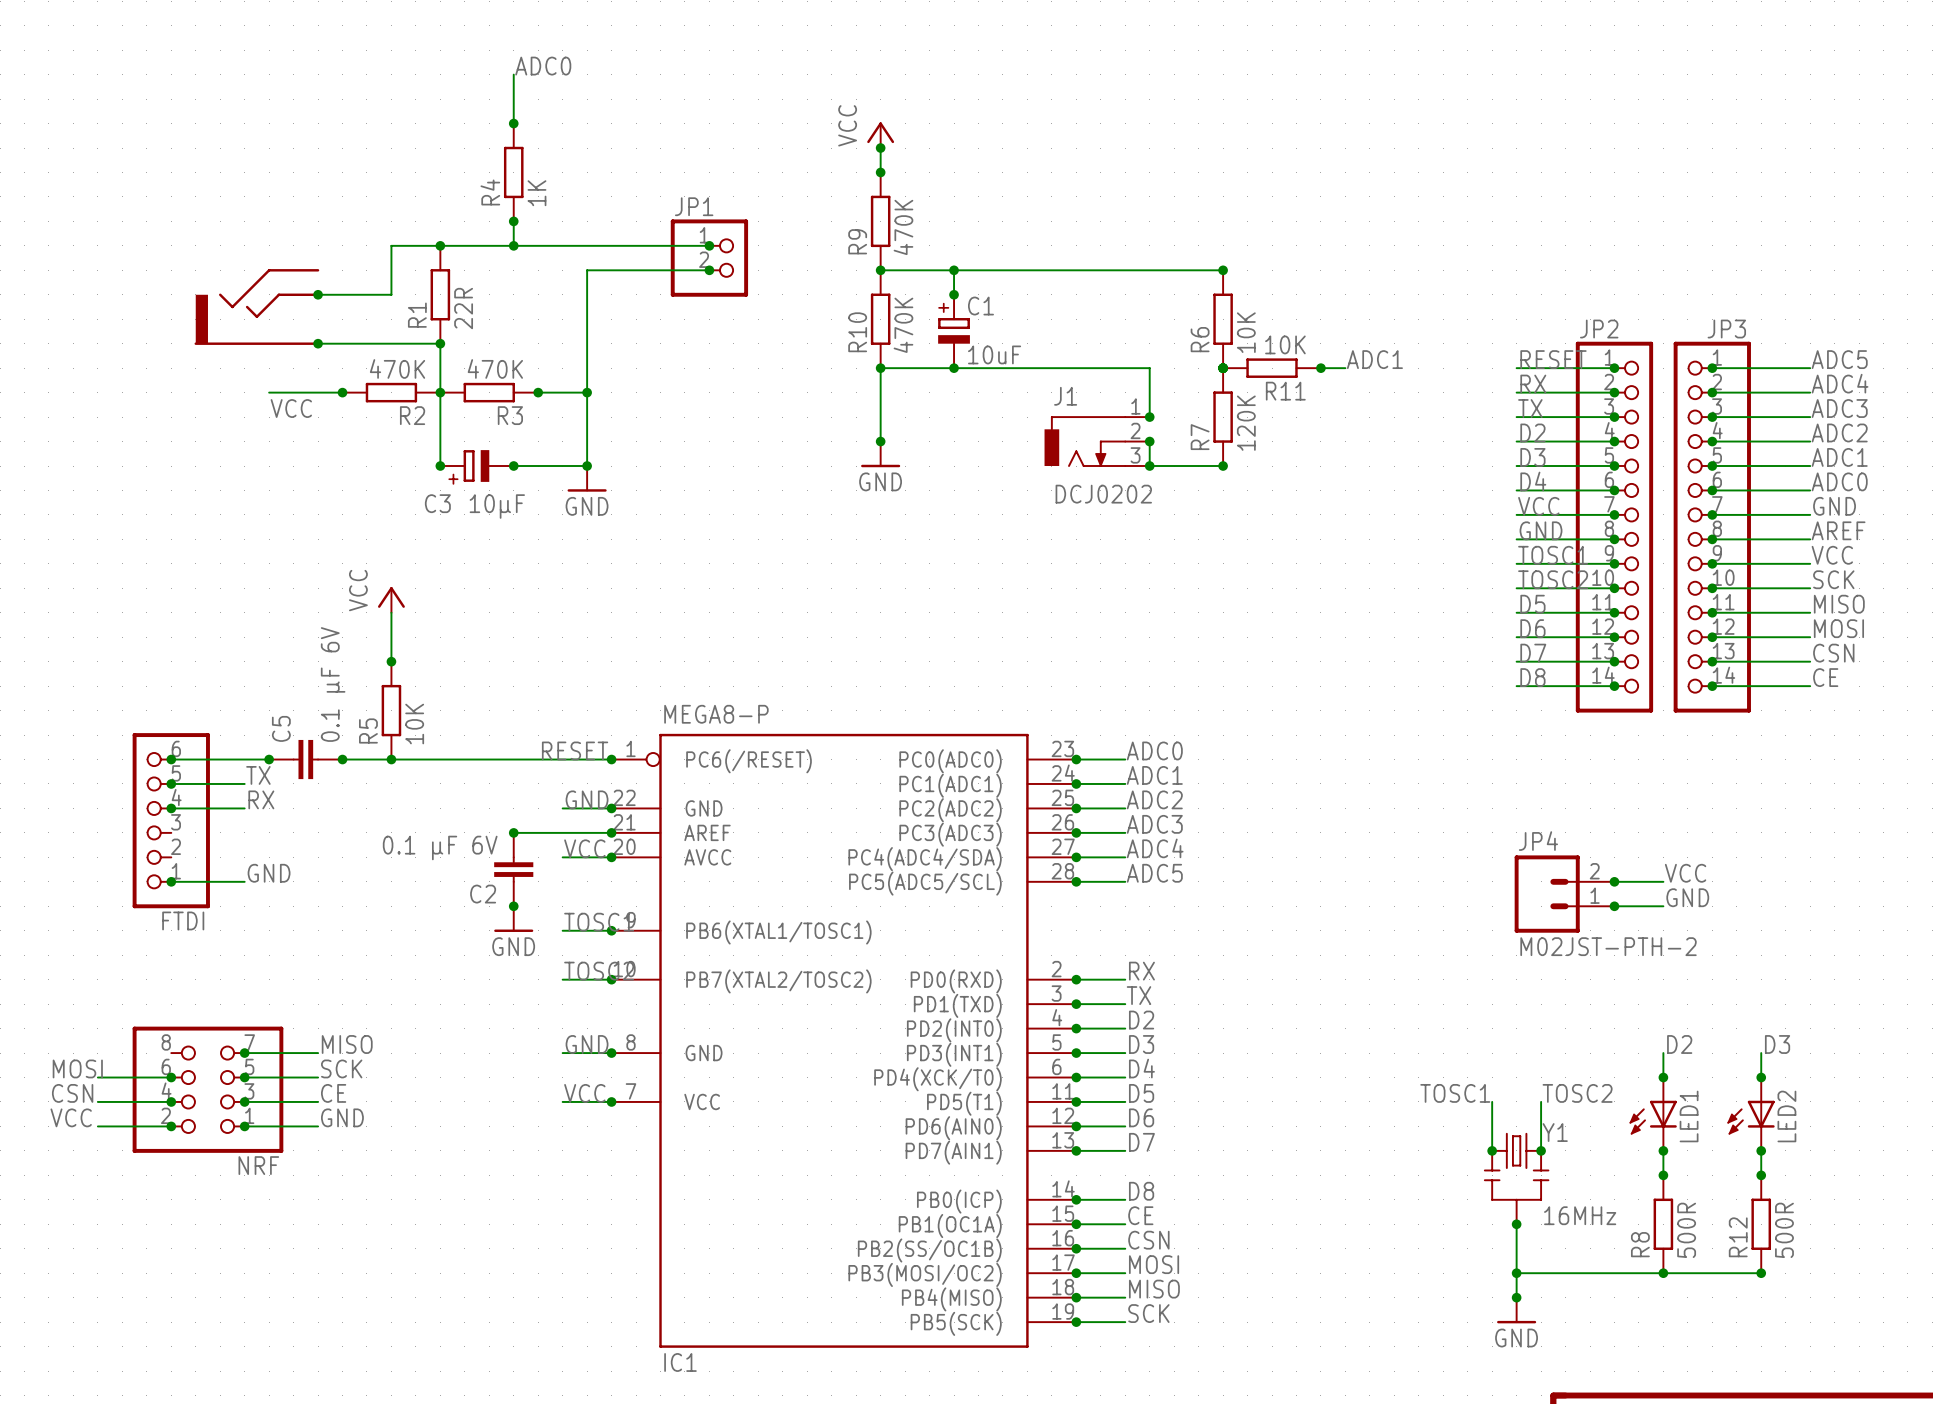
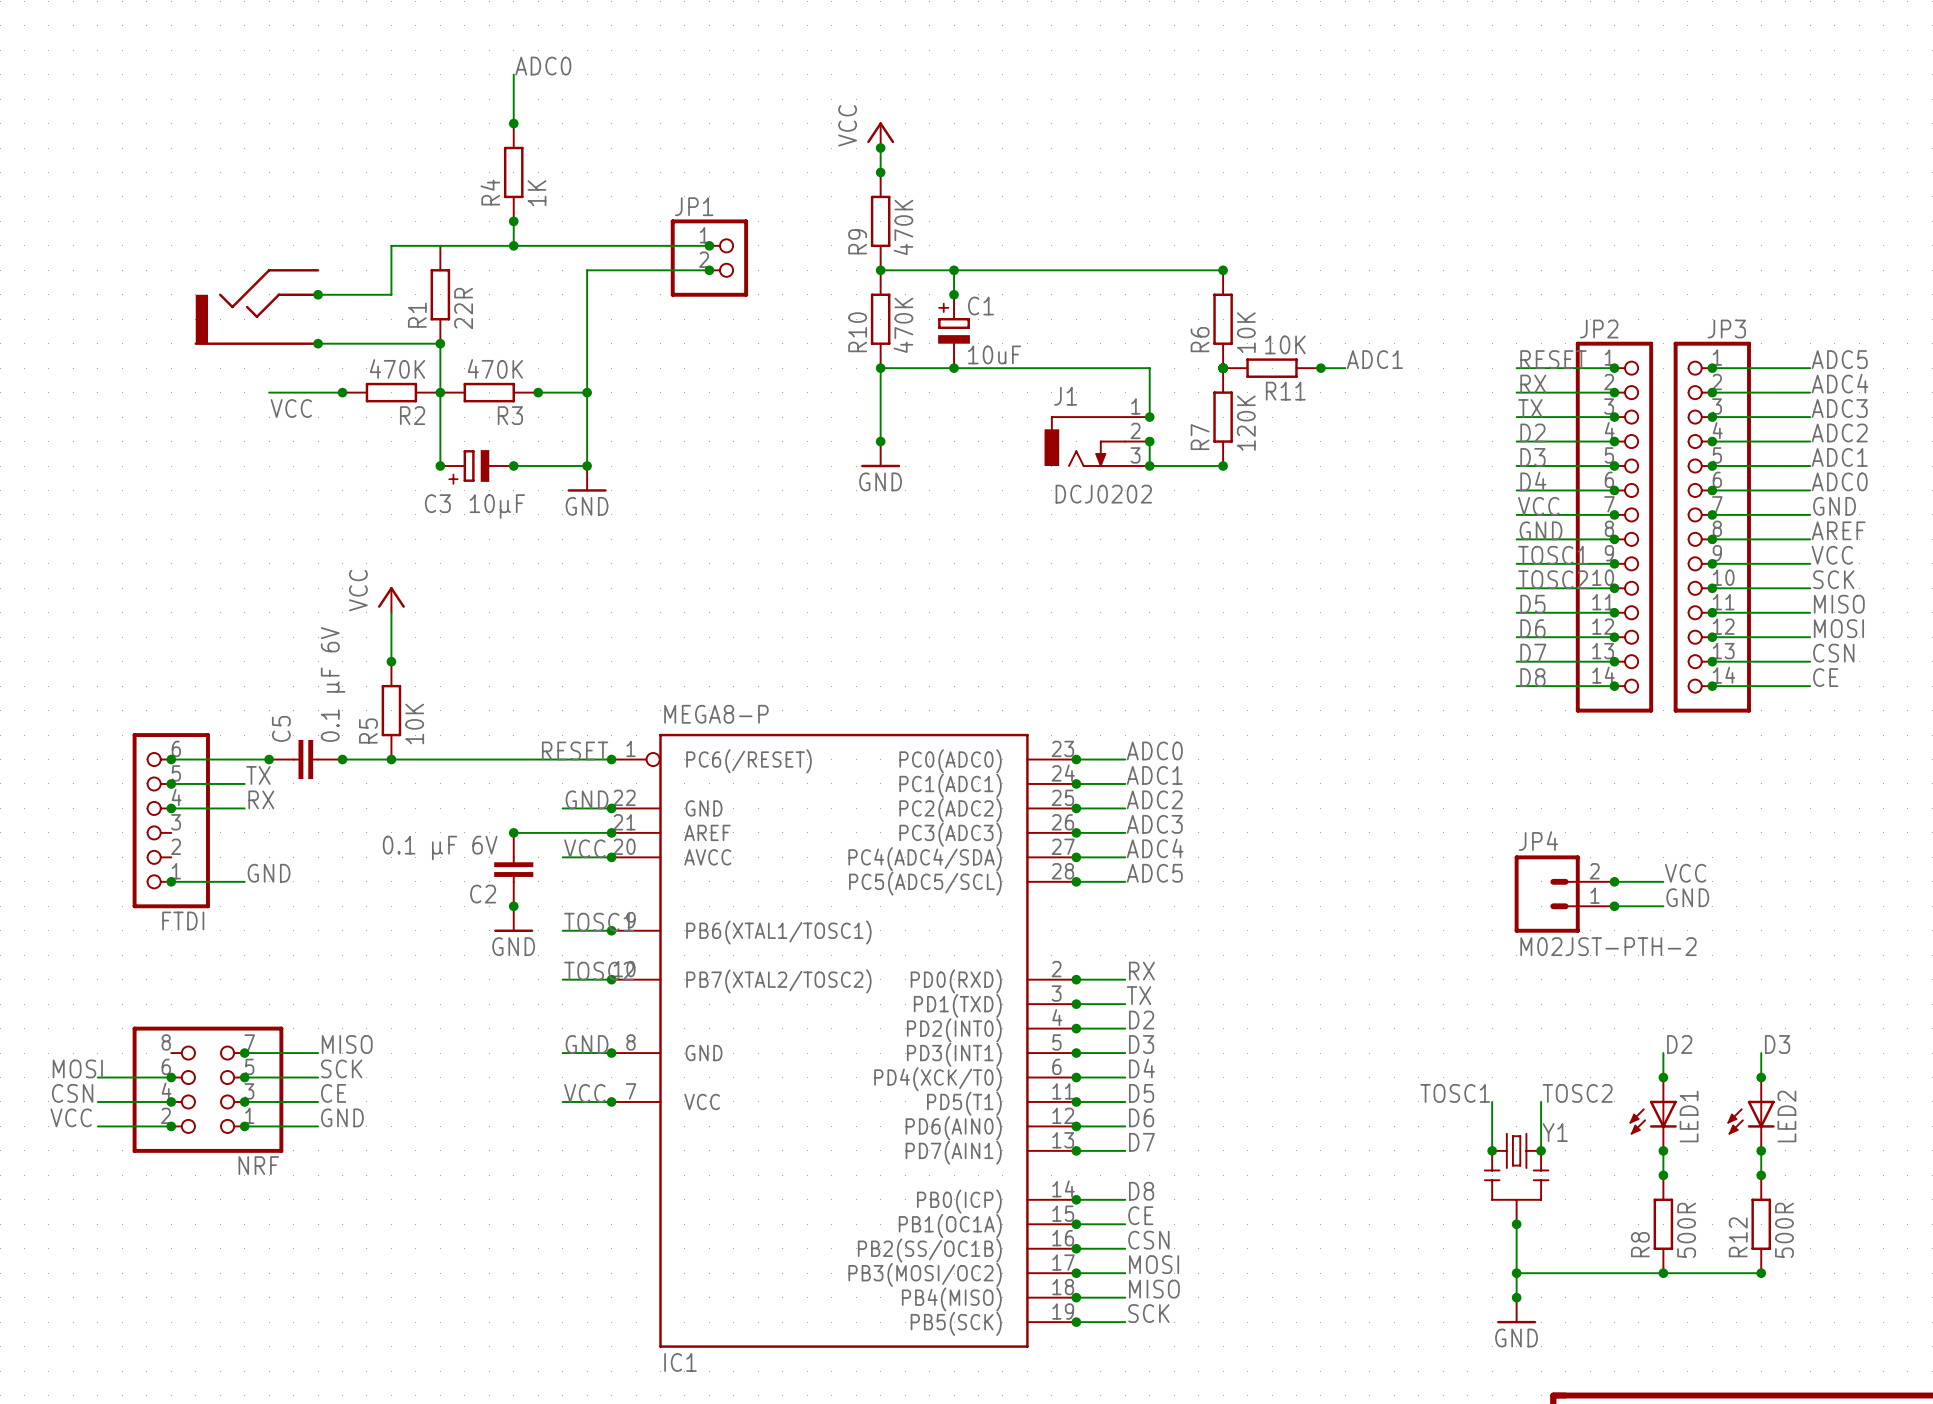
junction: (440, 245) -> none
Y1 value: 16MHz (1580, 1215) -> none

